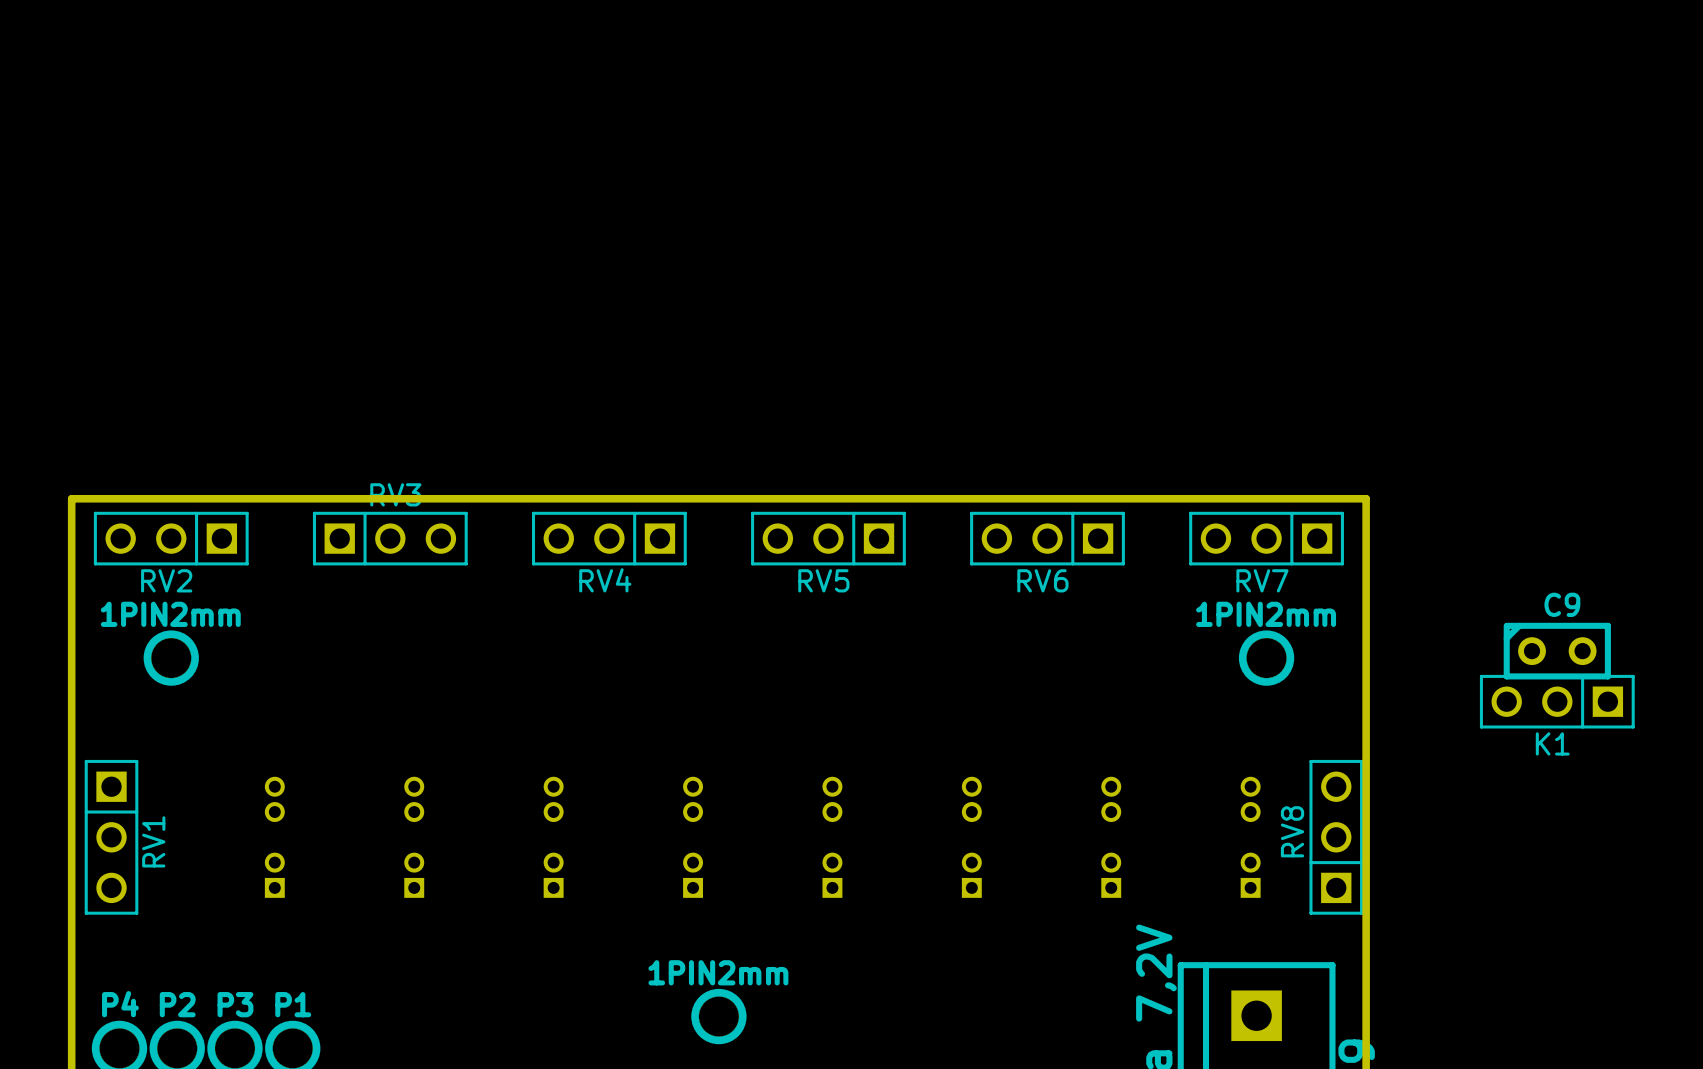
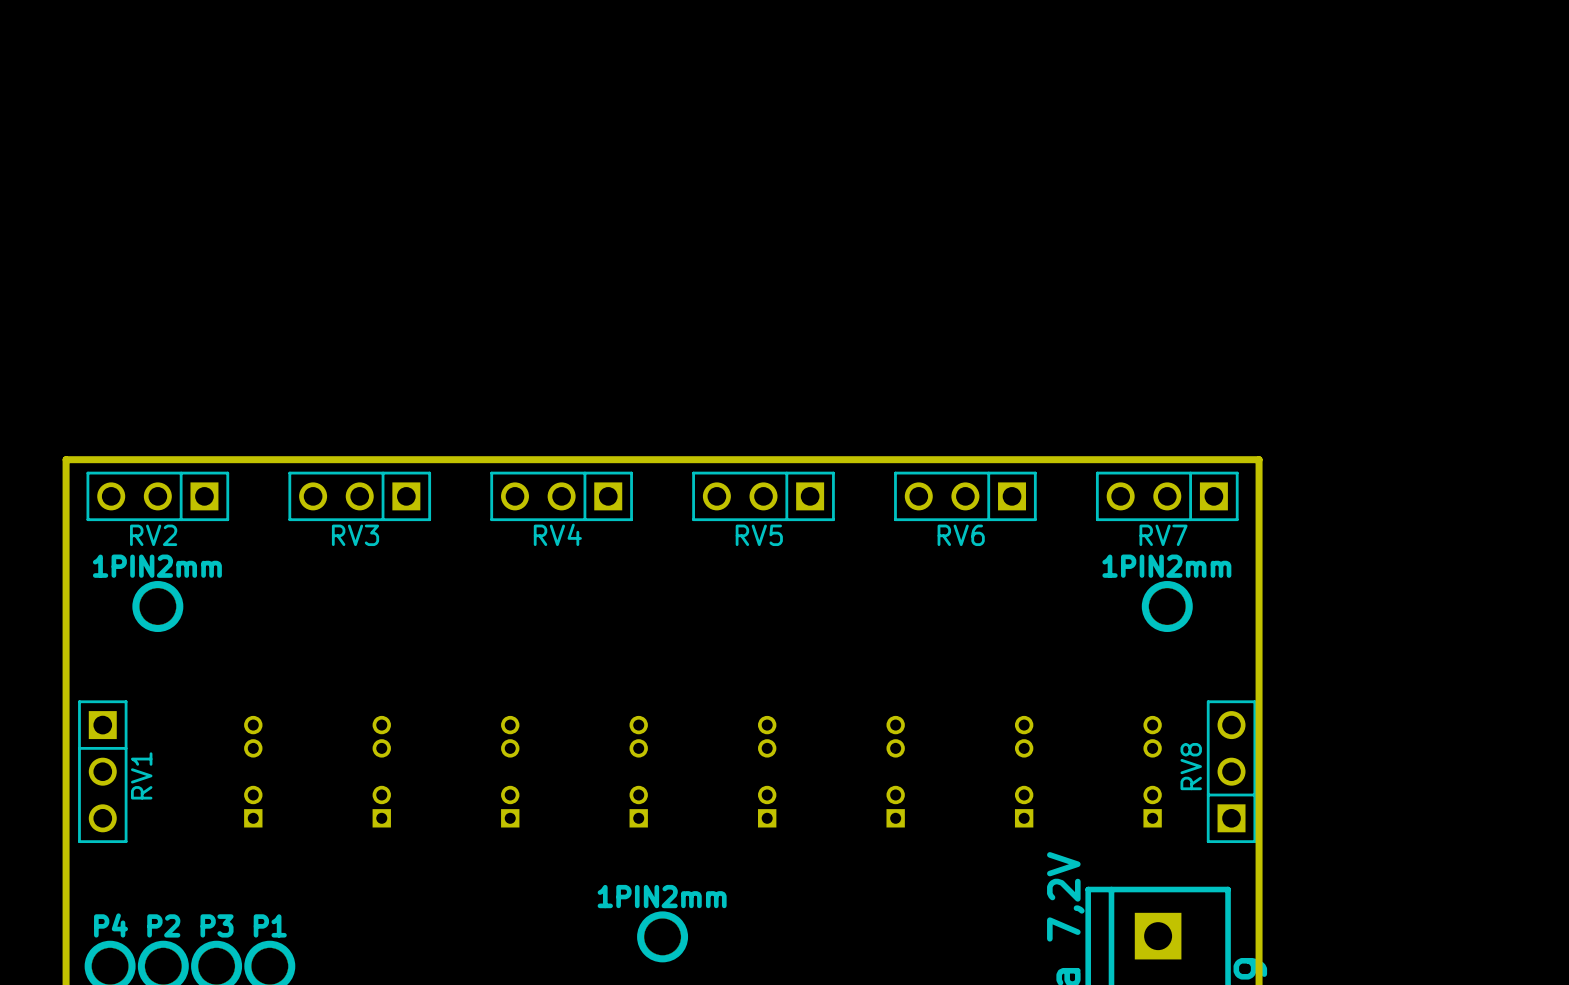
RV3 rotation: 0° (390, 538) -> 180° (359, 496)
C9: (1557, 651) -> none
K1: (1557, 701) -> none

